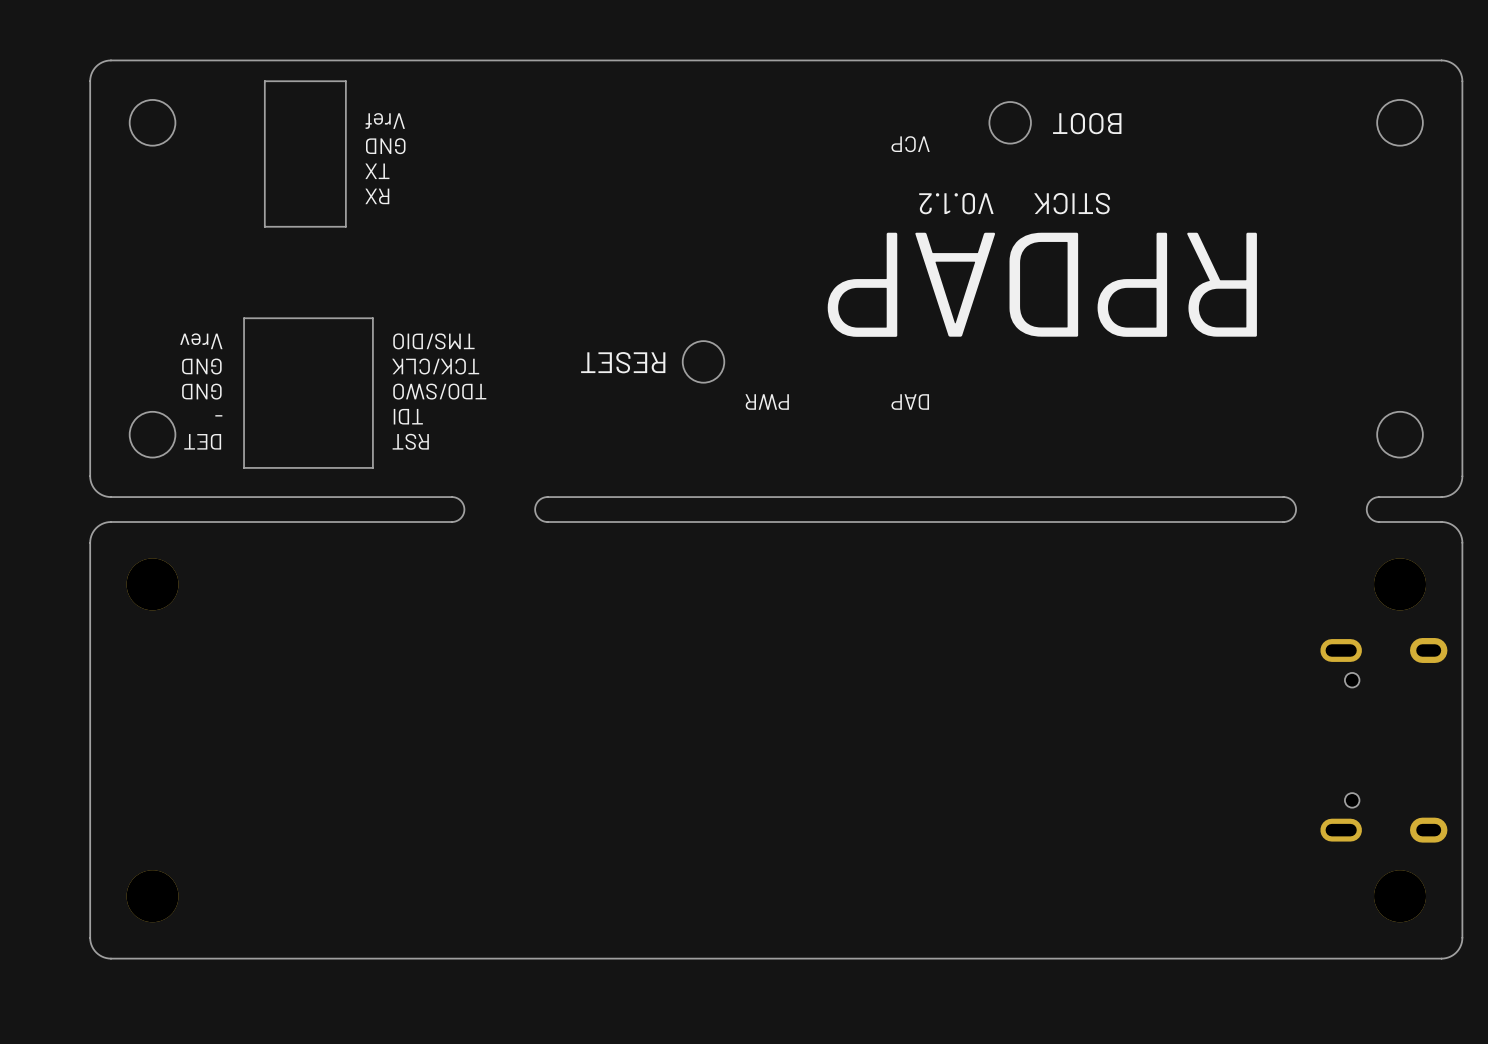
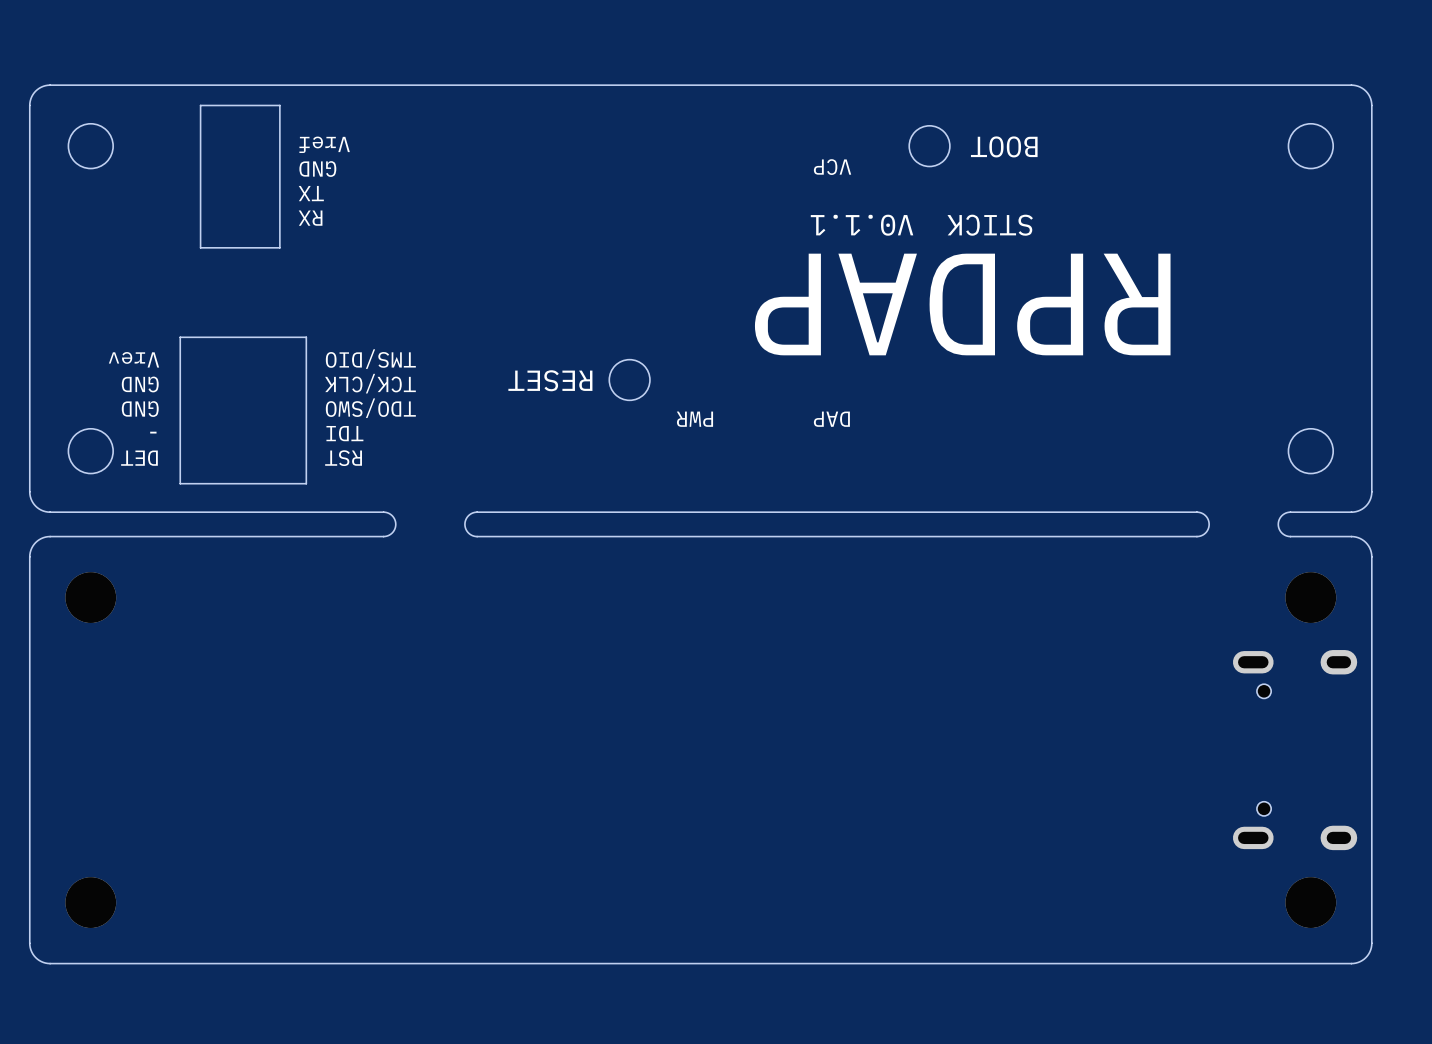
text: V0.1.2 (956, 203) -> V0.1.1 (862, 225)

